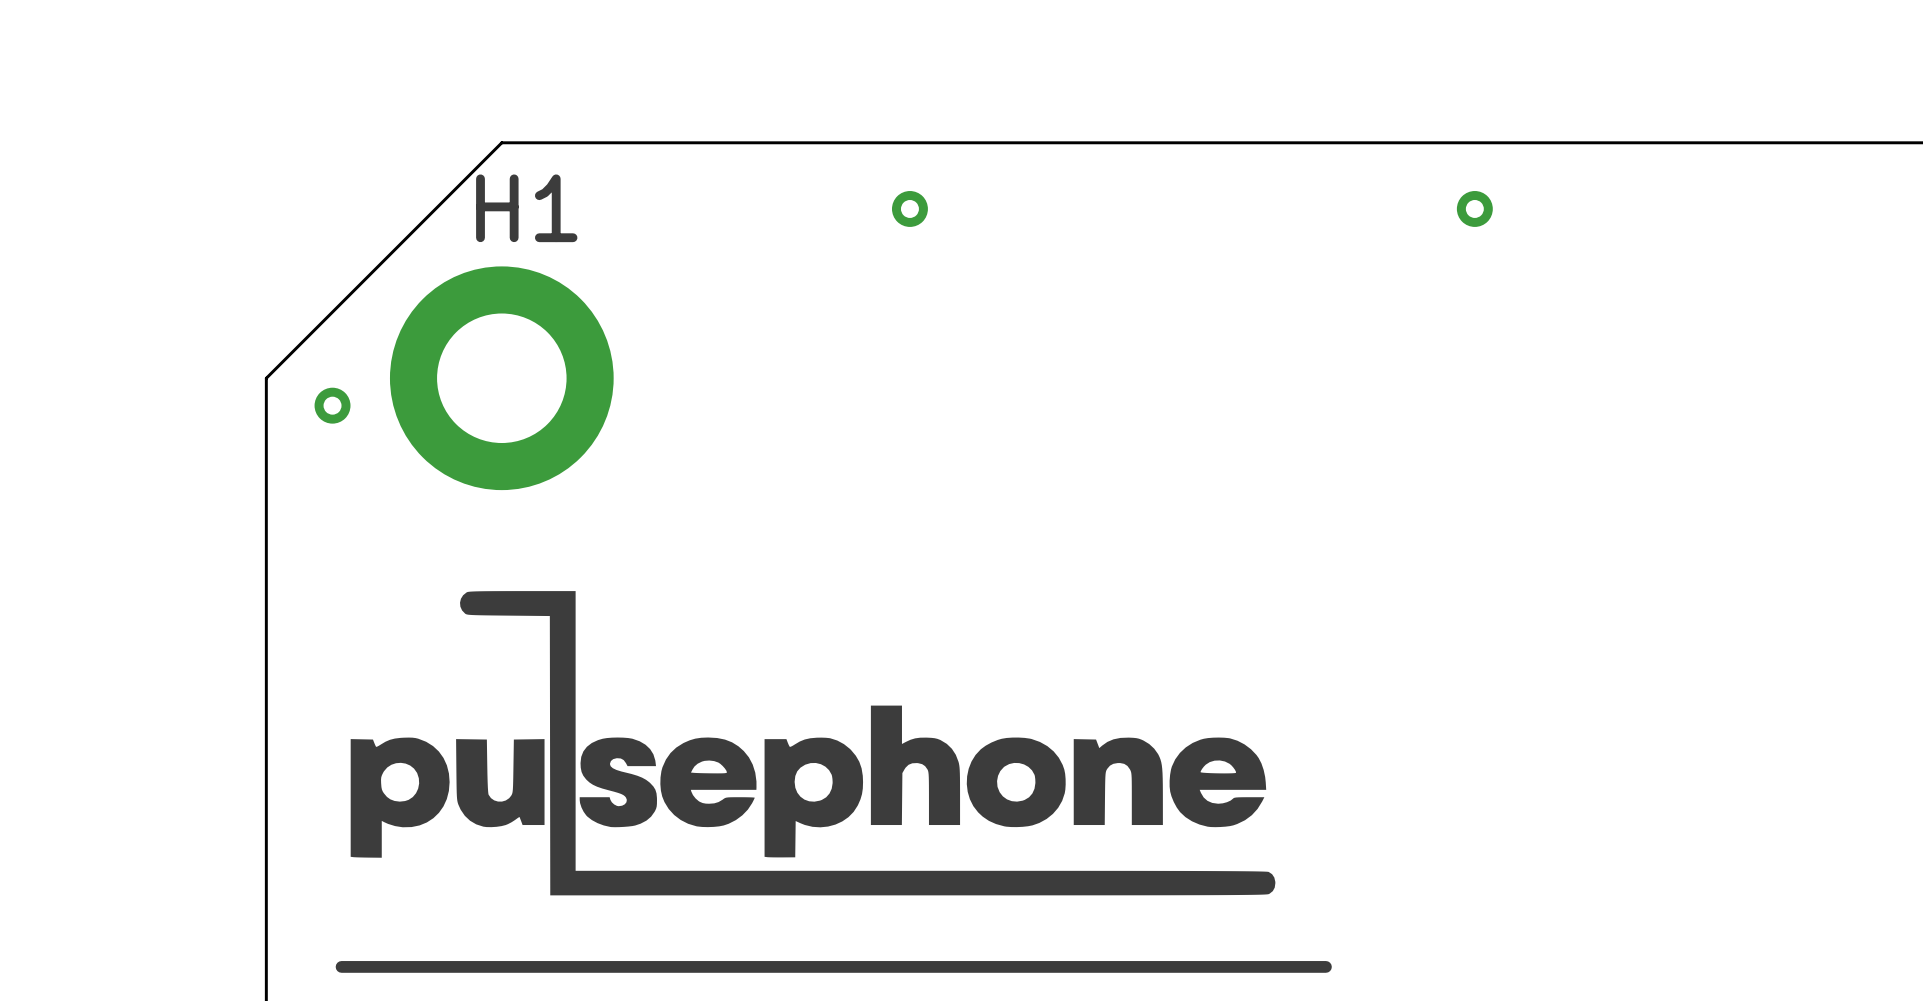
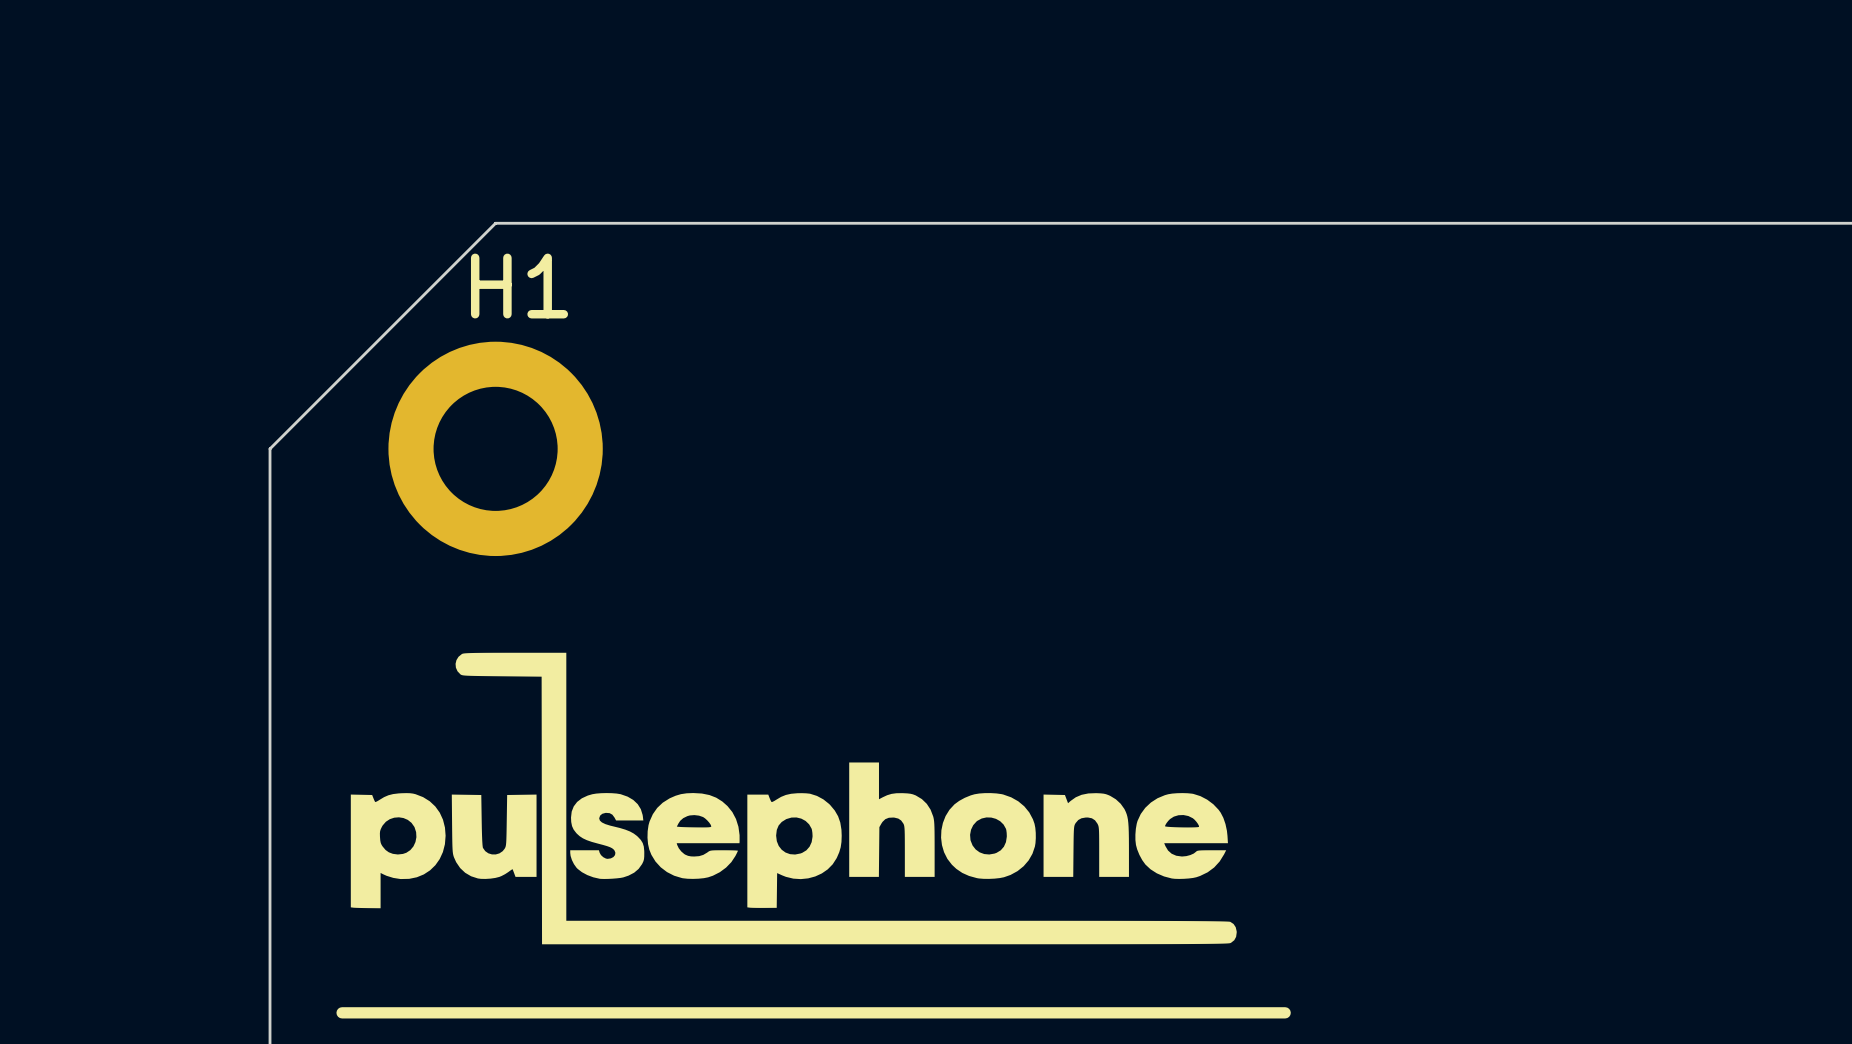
via: (909, 208) -> none
via: (1474, 208) -> none
via: (332, 405) -> none

